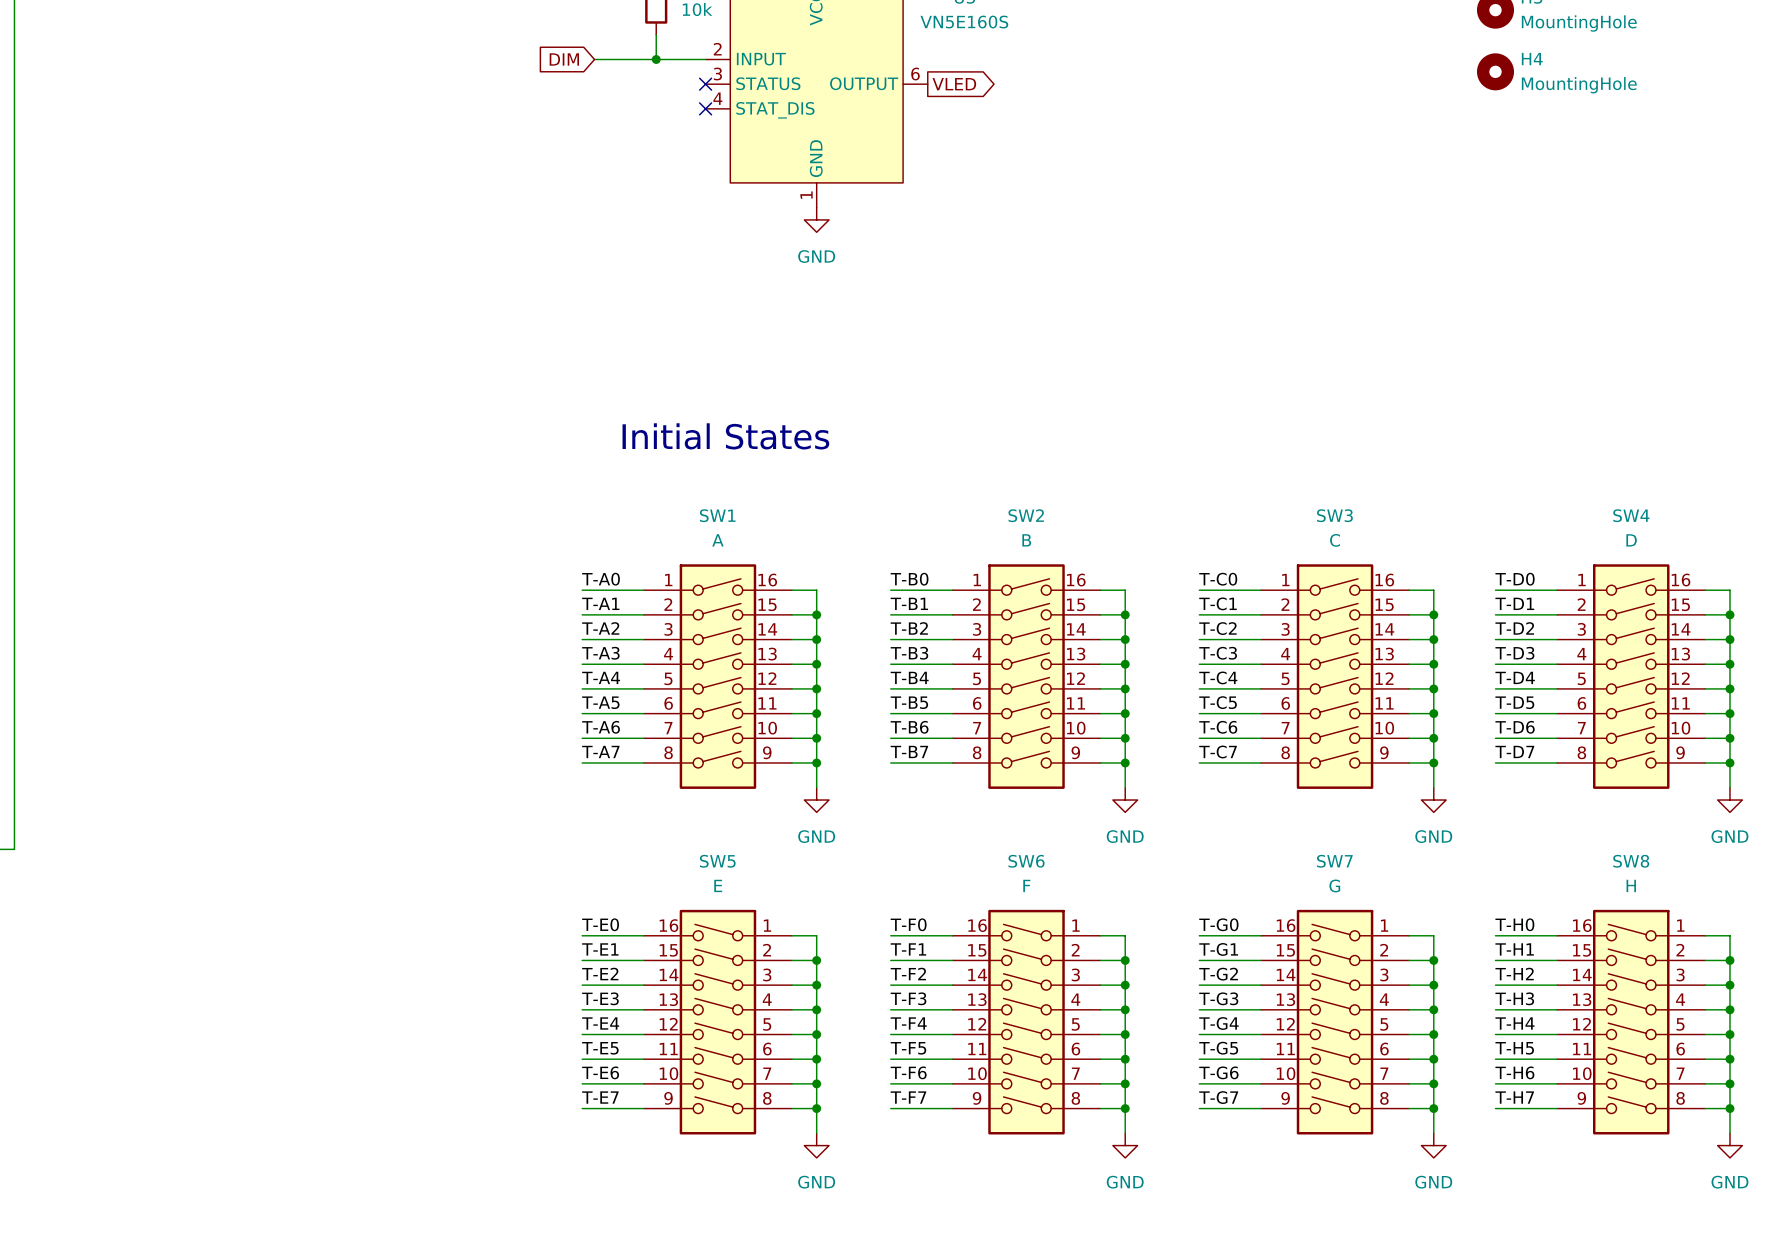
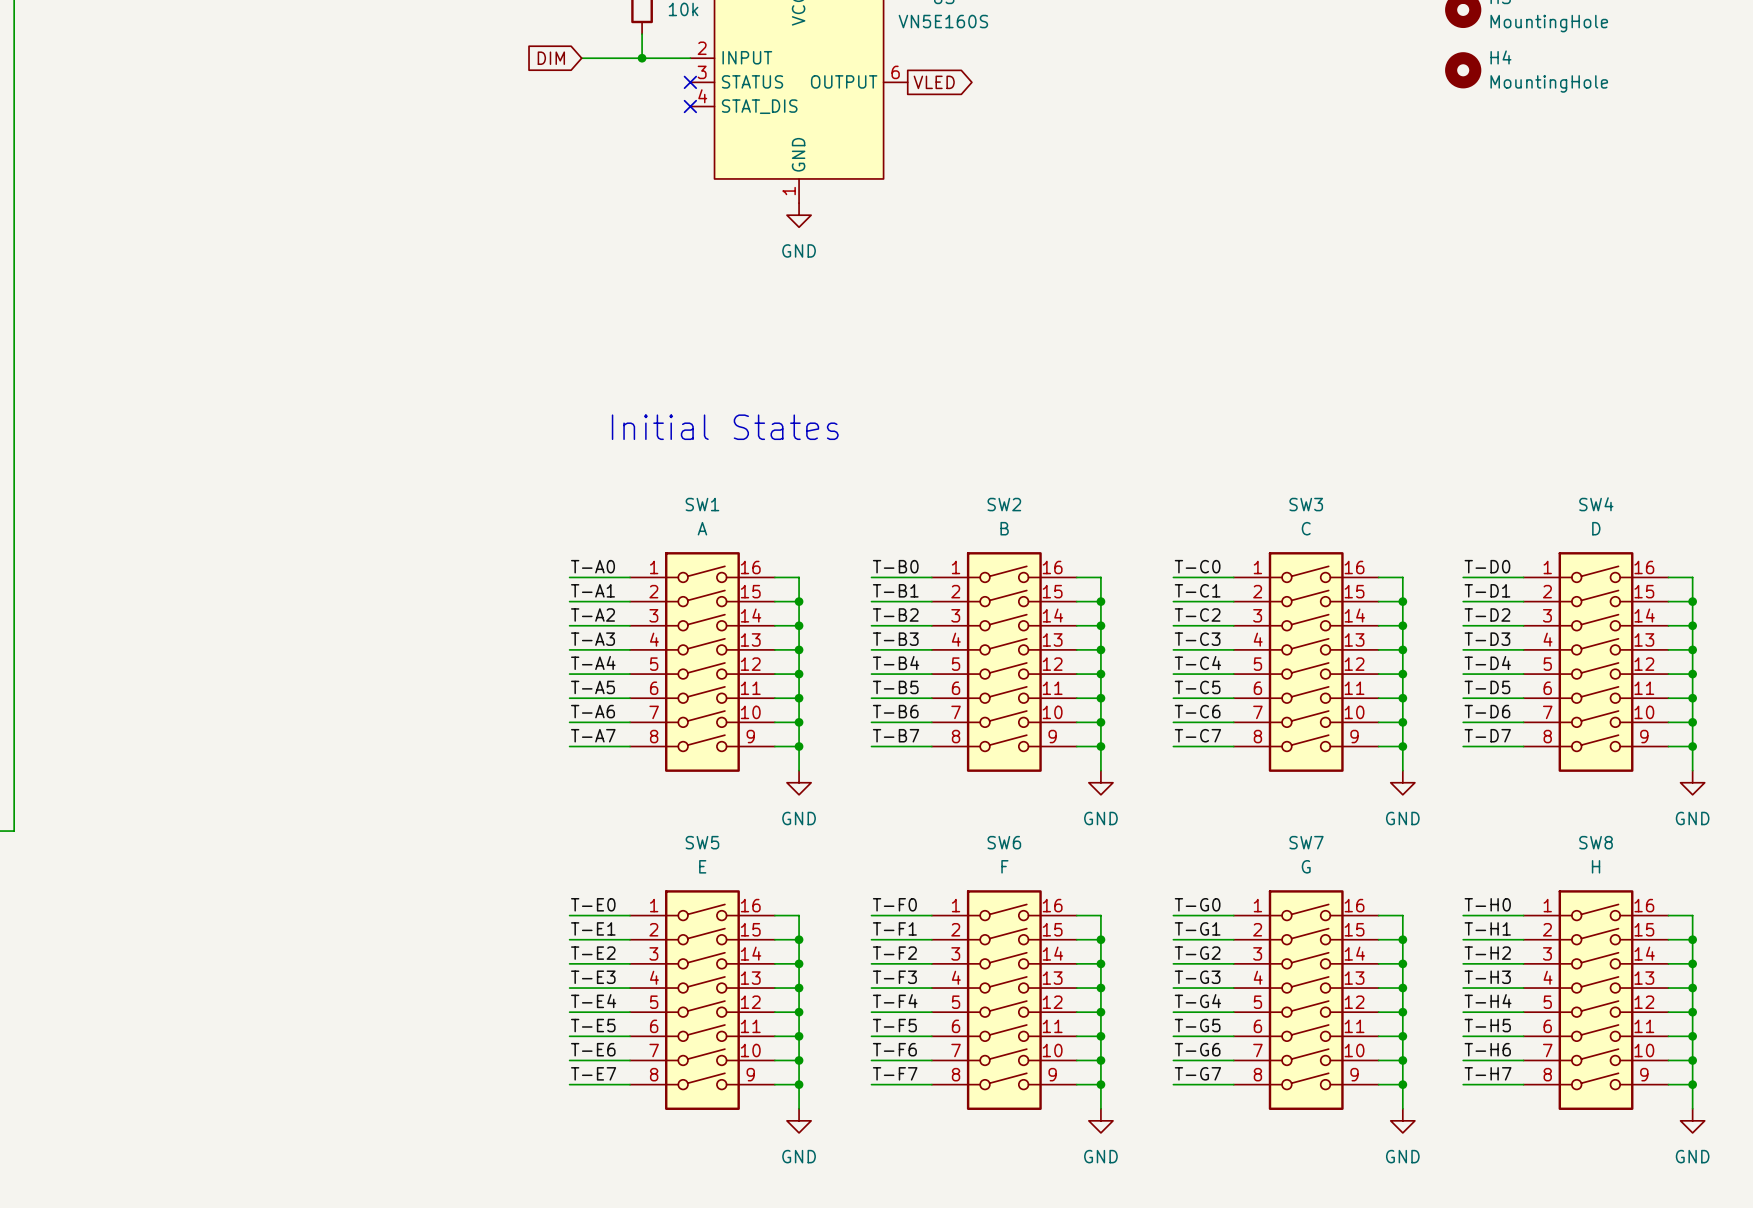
SW5 flip: as is (717, 1022) -> left-right (702, 1000)
SW6 flip: as is (1026, 1022) -> left-right (1004, 1000)
SW7 flip: as is (1335, 1022) -> left-right (1306, 1000)
SW8 flip: as is (1631, 1022) -> left-right (1596, 1000)

